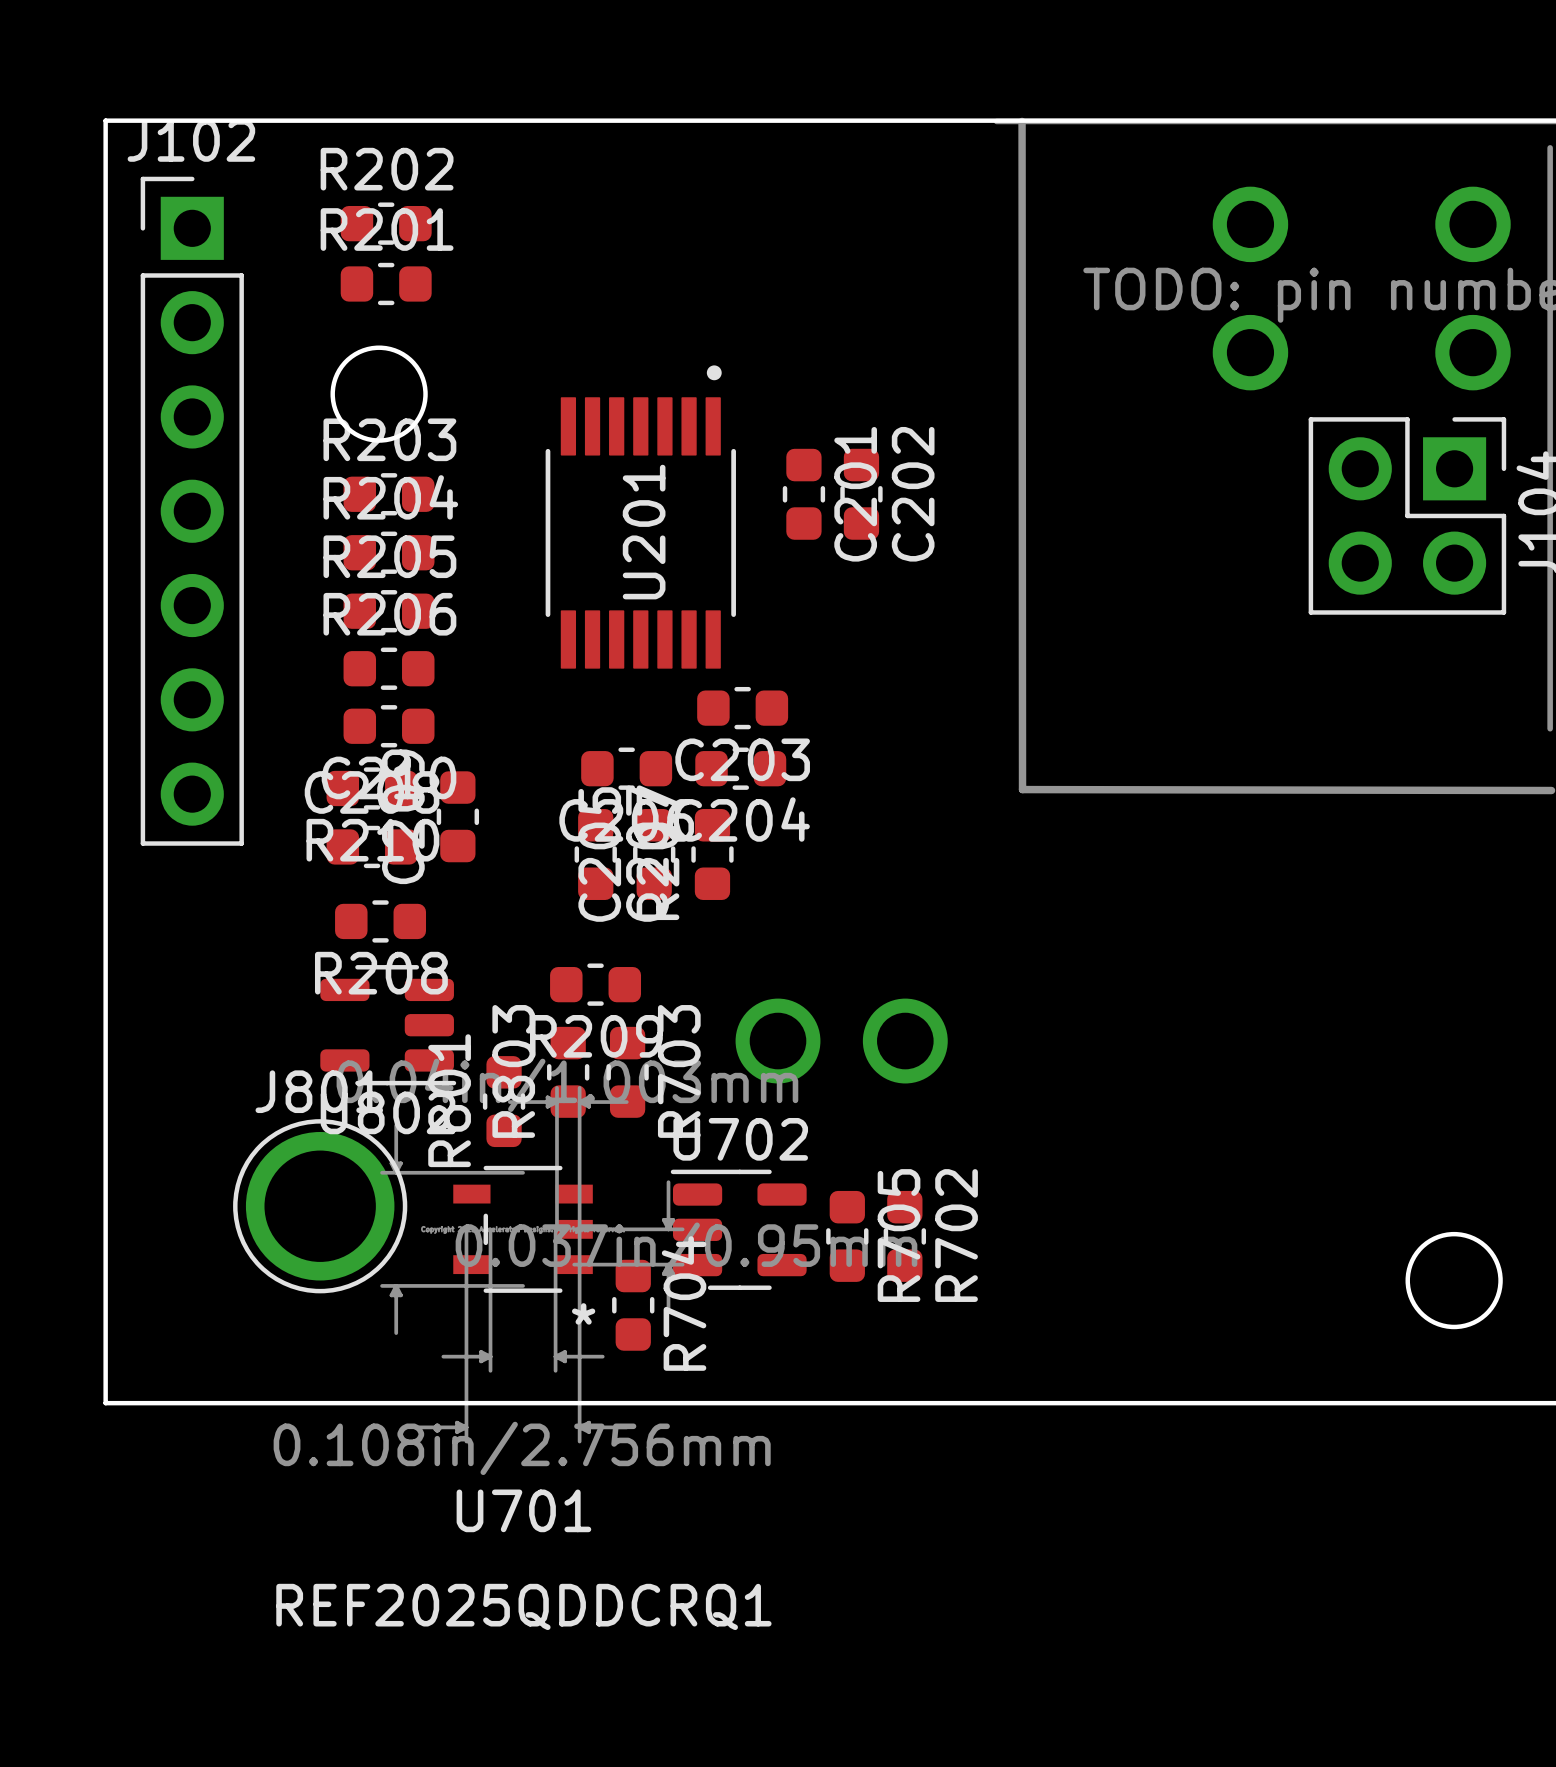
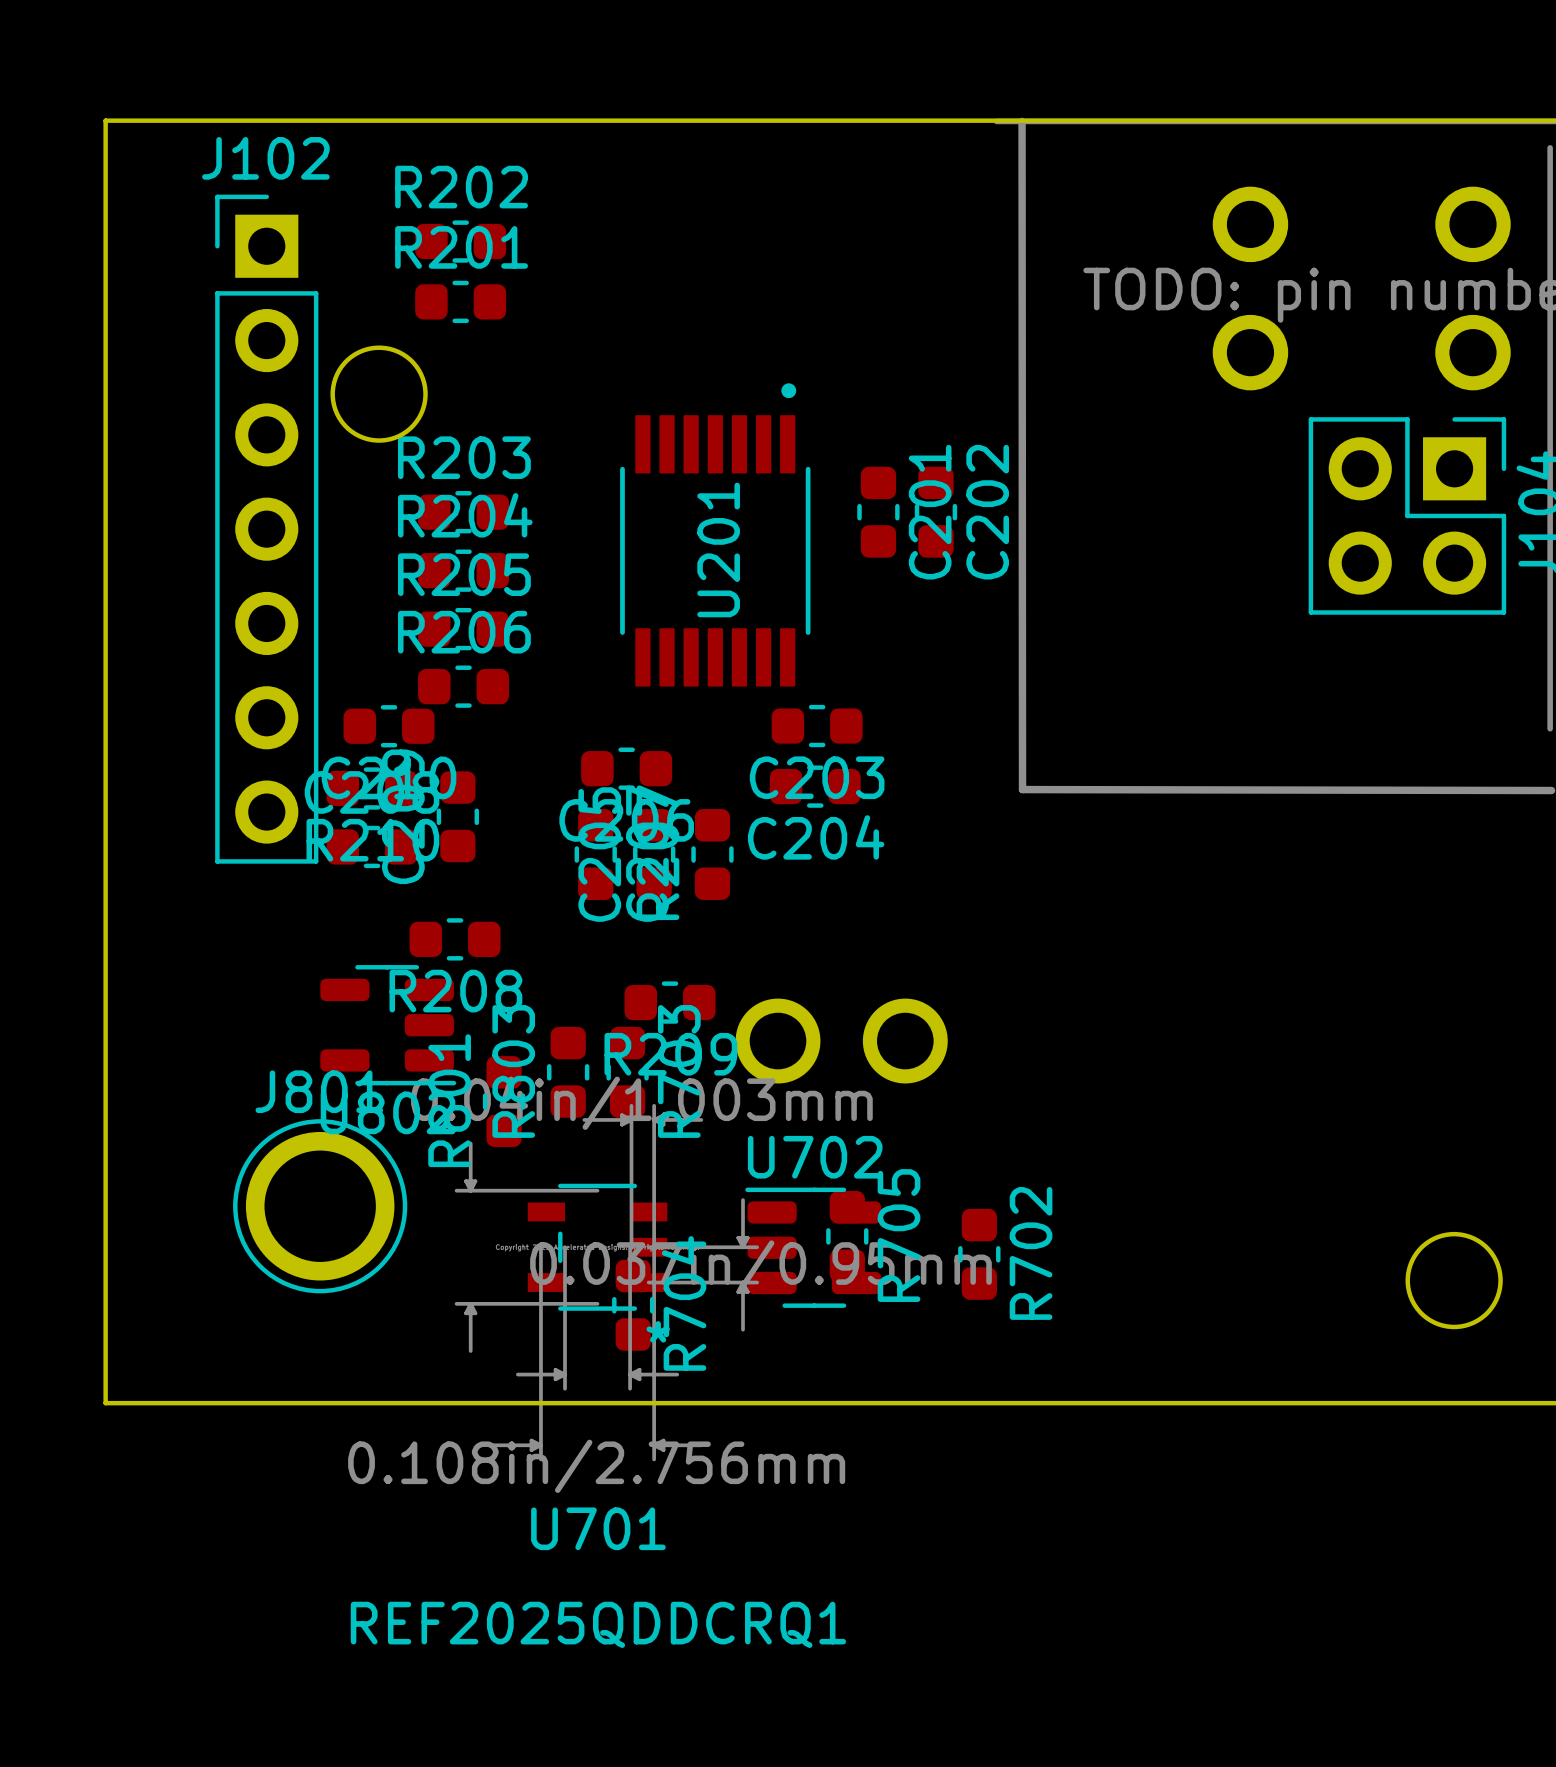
R202 position: (386, 223) -> (460, 241)
R201 position: (386, 283) -> (460, 301)
R203 position: (389, 494) -> (463, 512)
C201 position: (803, 494) -> (878, 512)
C202 position: (861, 494) -> (935, 512)
J102 position: (192, 511) -> (266, 529)
U201 position: (640, 517) -> (715, 534)
R204 position: (389, 552) -> (463, 570)
R205 position: (389, 611) -> (463, 629)
R206 position: (389, 668) -> (463, 686)
C203 position: (742, 708) -> (817, 726)
C204 position: (740, 768) -> (815, 786)
R208 position: (380, 921) -> (455, 939)
R209 position: (595, 984) -> (670, 1002)
U702 position: (738, 1229) -> (813, 1247)
R702 position: (904, 1236) -> (979, 1254)
U701 position: (532, 1264) -> (606, 1282)

